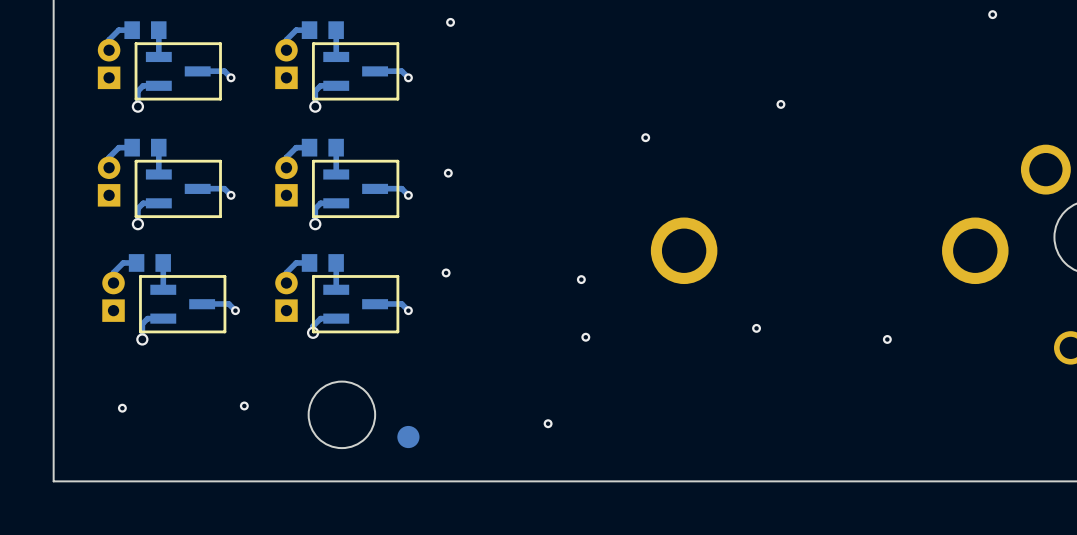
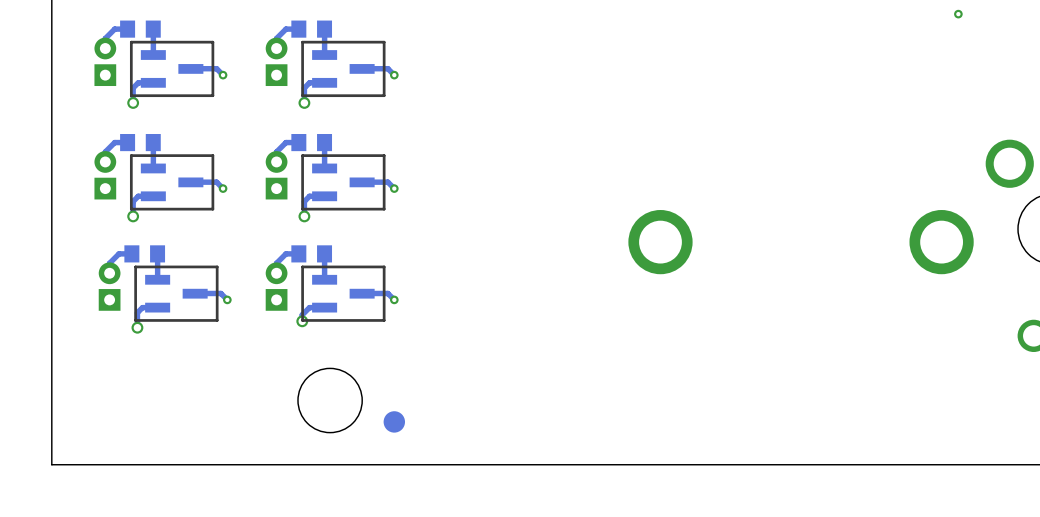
via: (450, 22) -> none
via: (780, 104) -> none
via: (645, 137) -> none
via: (448, 173) -> none
via: (446, 272) -> none
via: (581, 279) -> none
via: (756, 328) -> none
via: (585, 337) -> none
via: (887, 339) -> none
via: (244, 405) -> none
via: (122, 408) -> none
via: (548, 423) -> none

